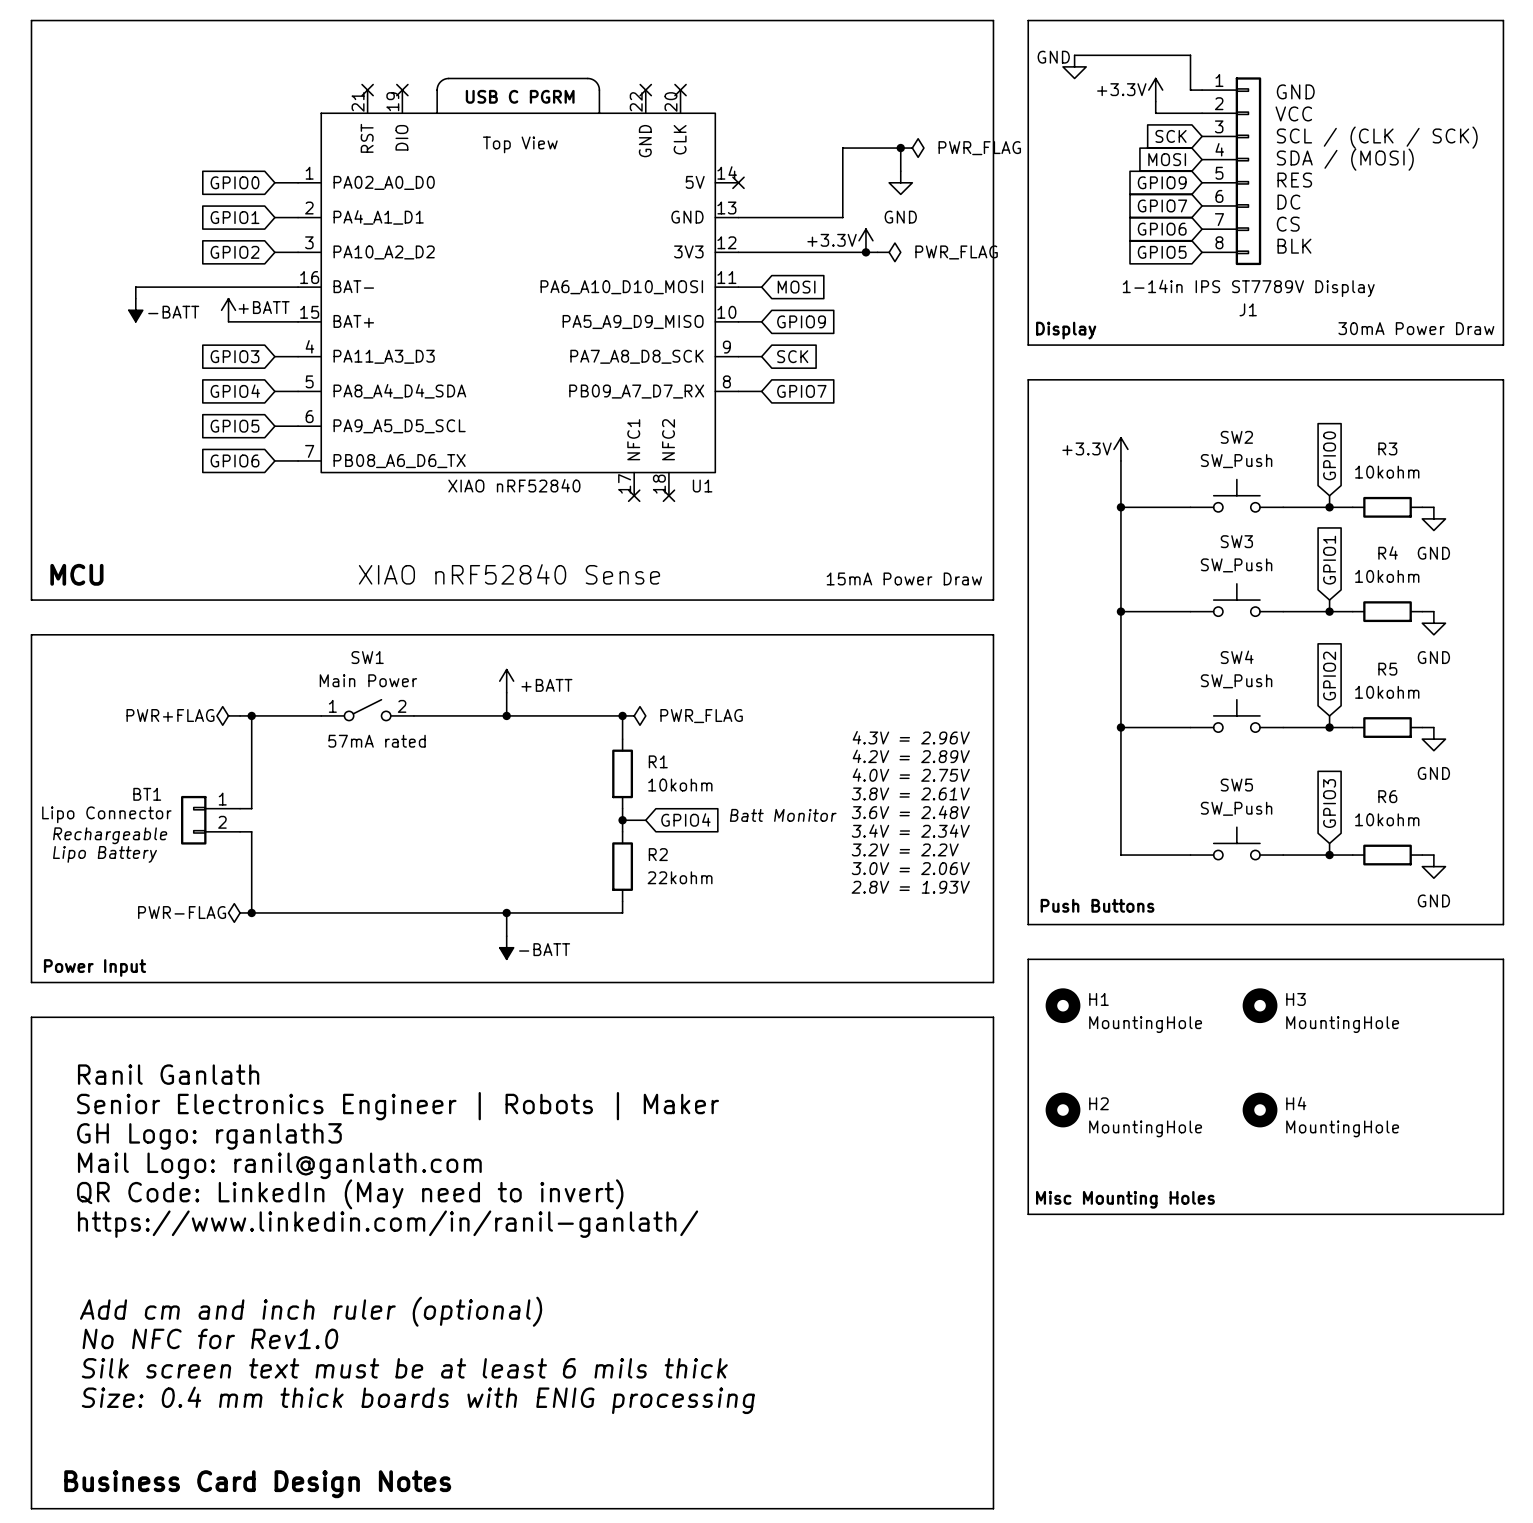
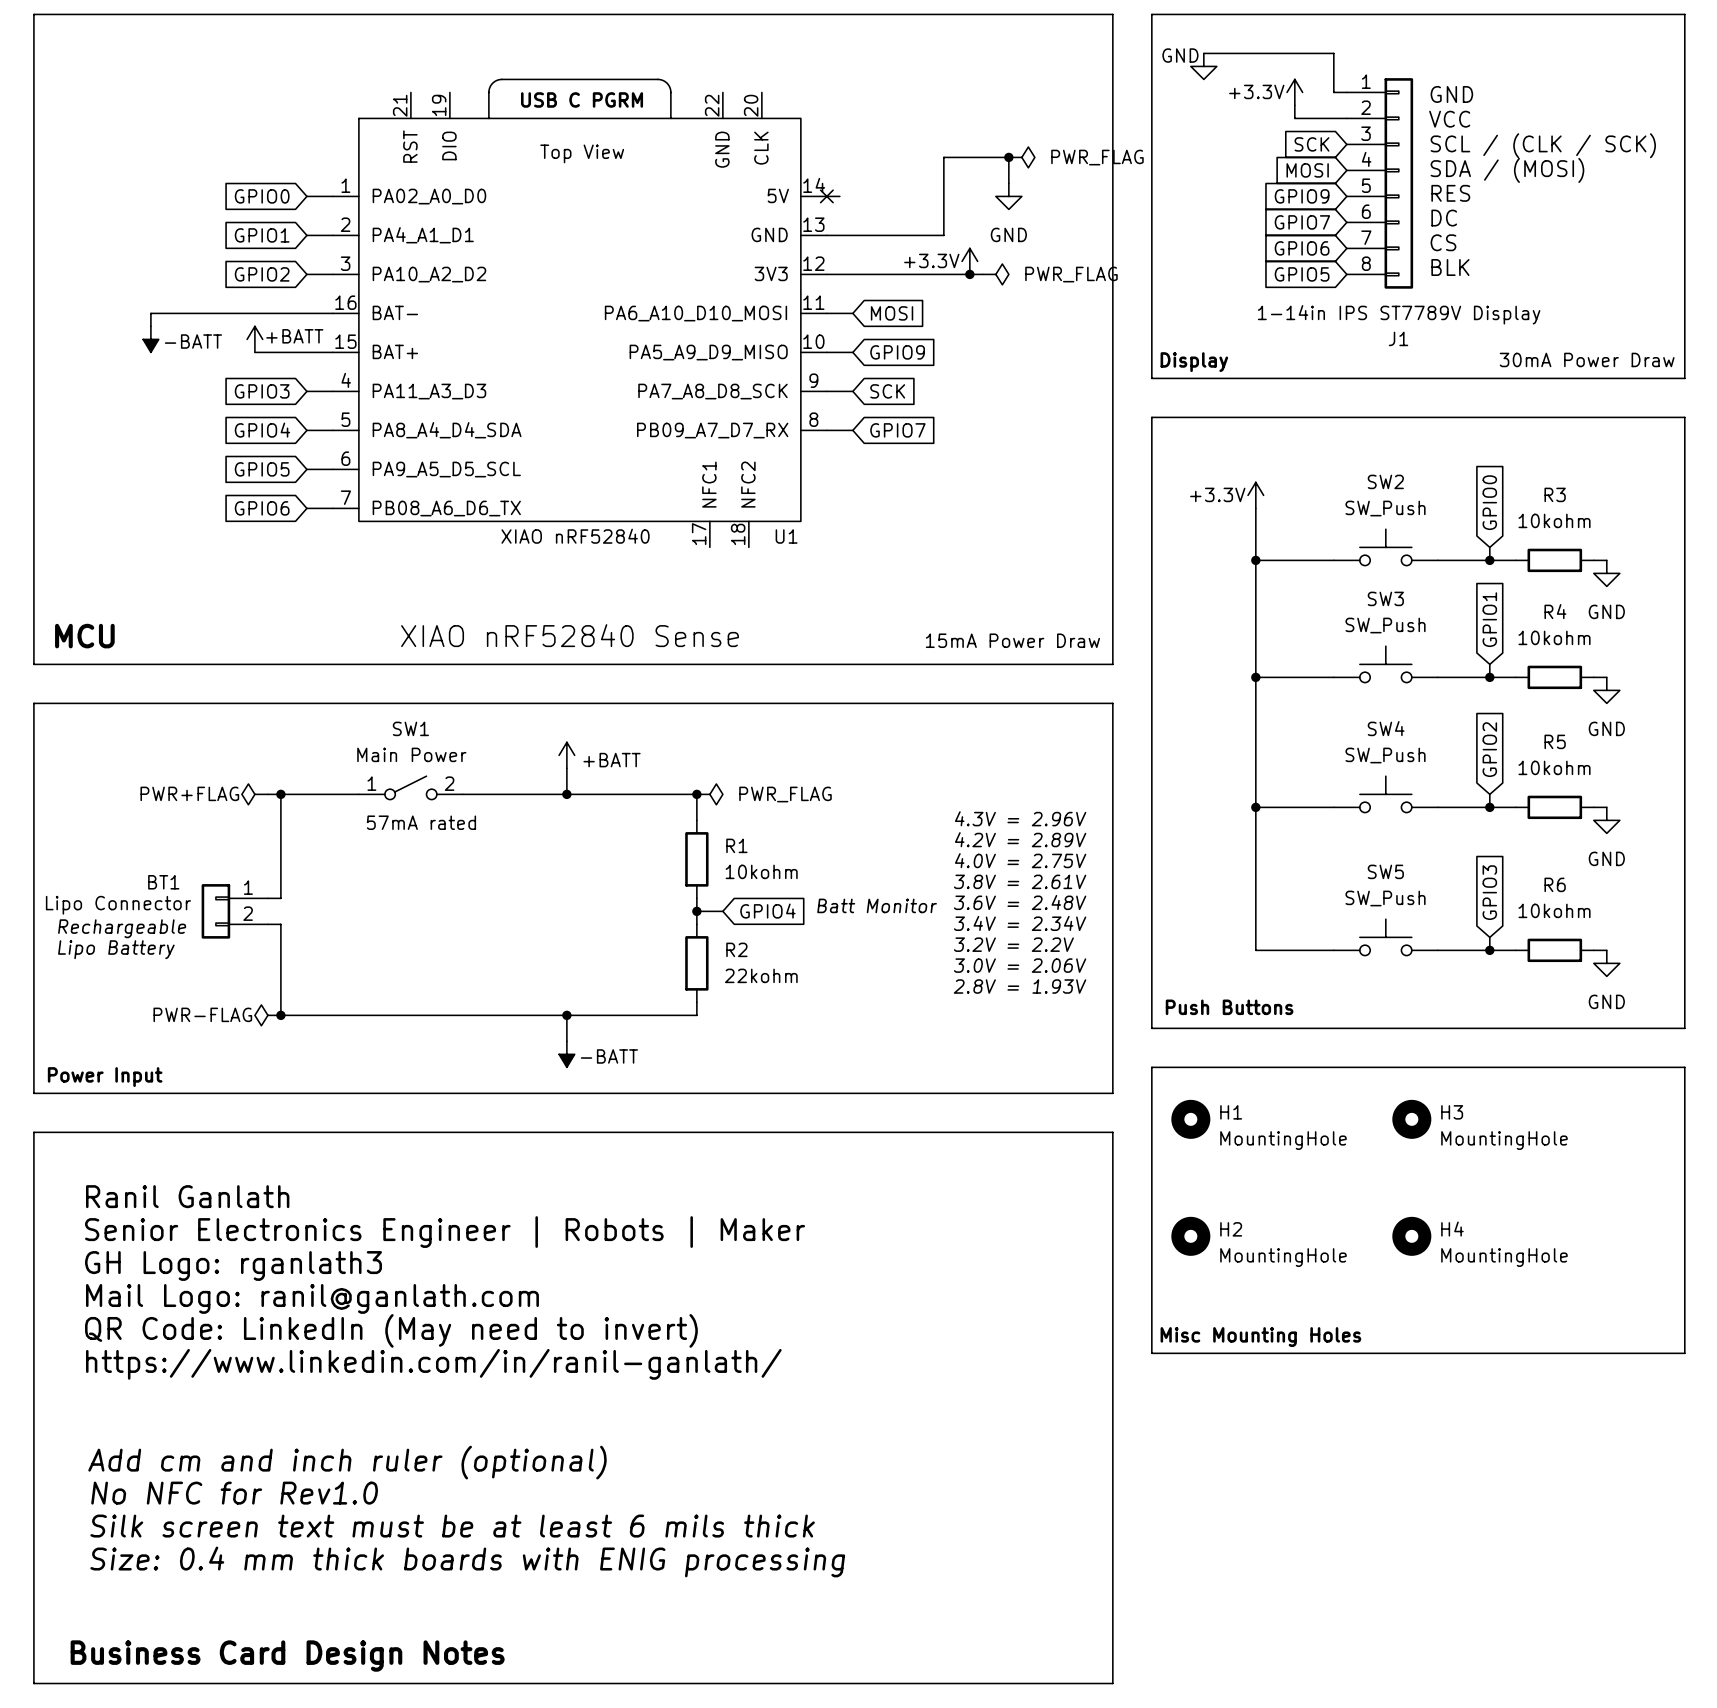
no-connect mark: (367, 90) -> none
no-connect mark: (402, 90) -> none
no-connect mark: (645, 90) -> none
no-connect mark: (680, 90) -> none
wire: none -> (826, 196) (839, 196)
no-connect mark: (634, 495) -> none
no-connect mark: (668, 495) -> none

